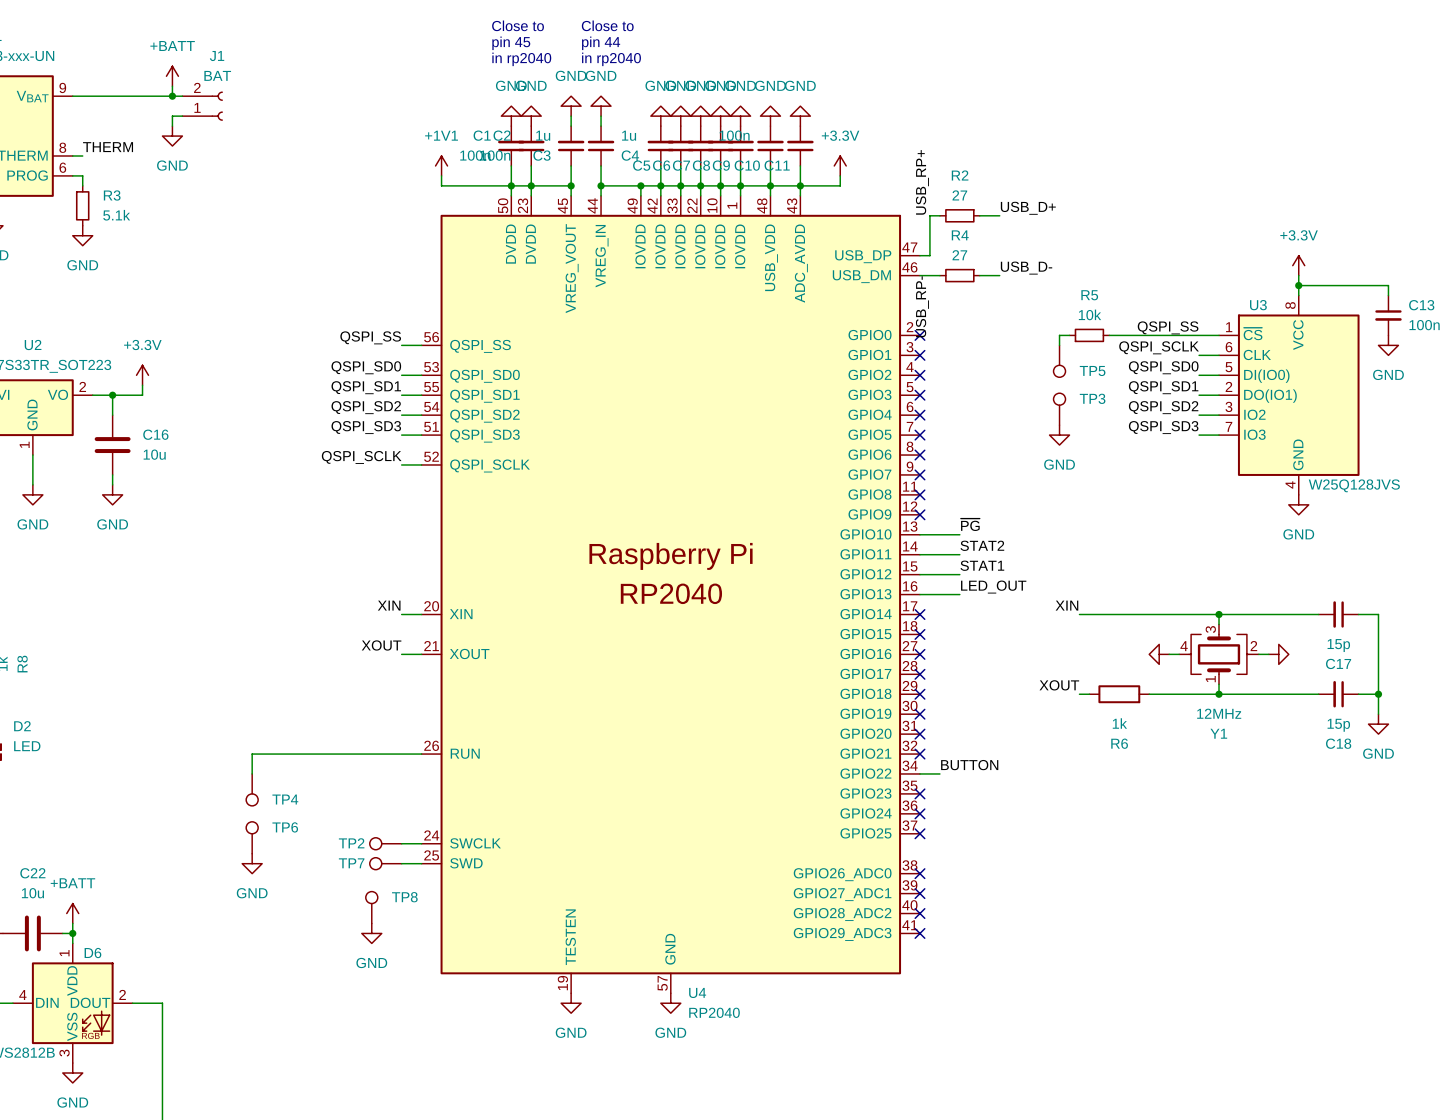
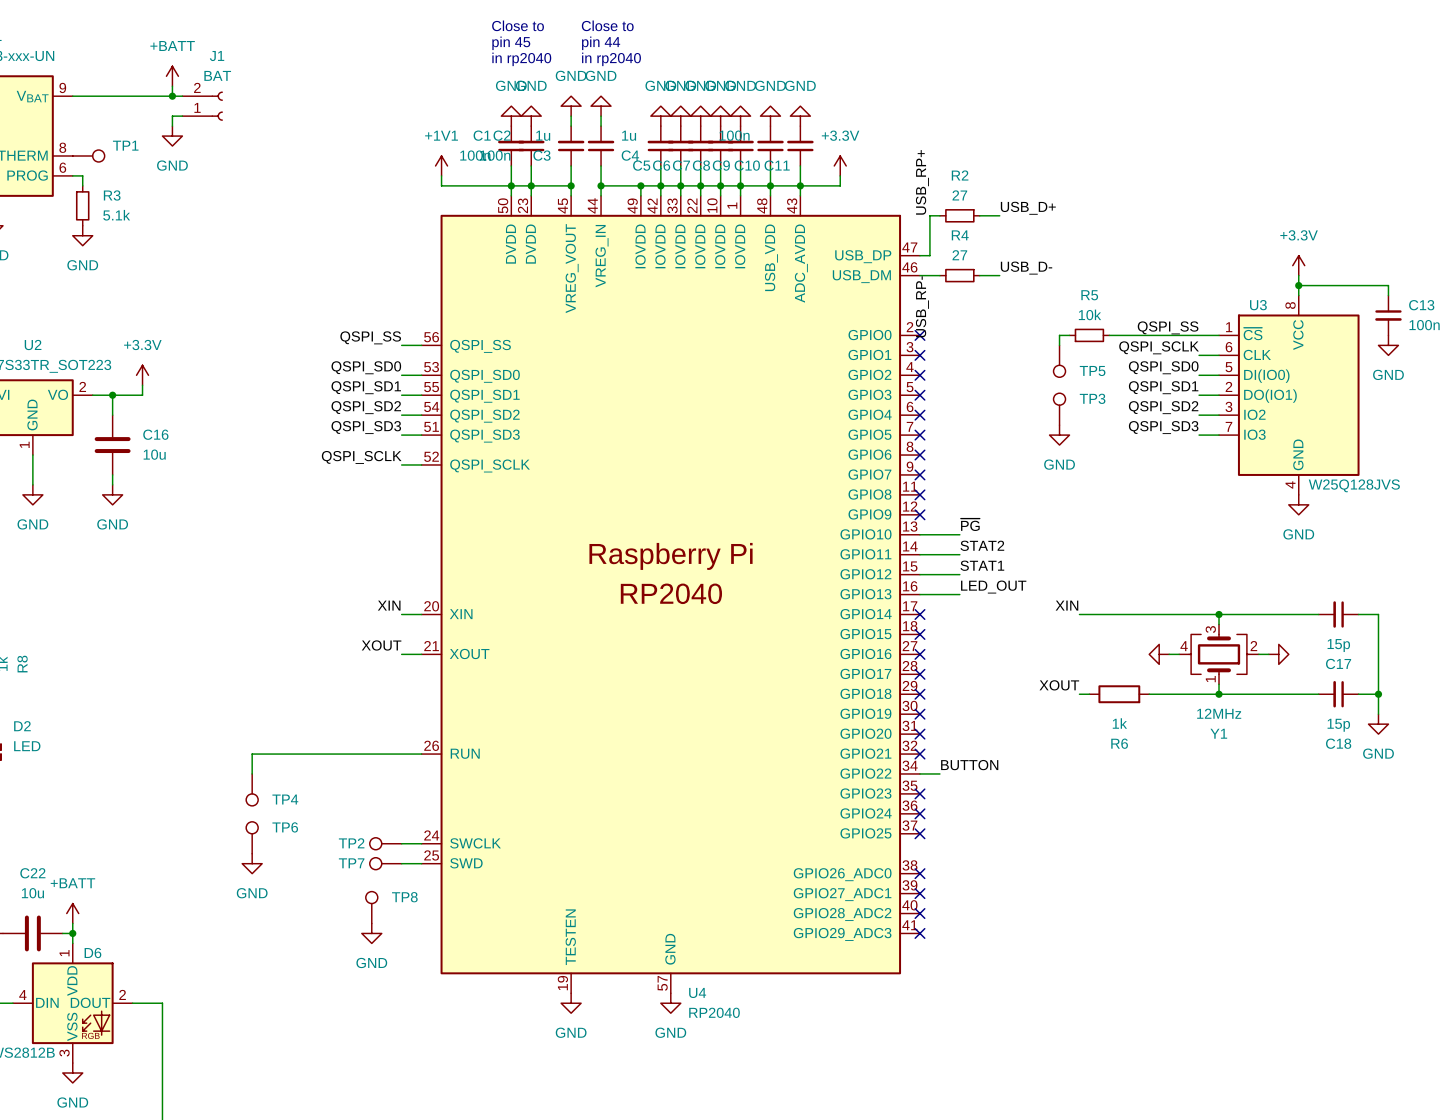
label: THERM (108, 147) -> none
TP1: none -> (88, 156)

